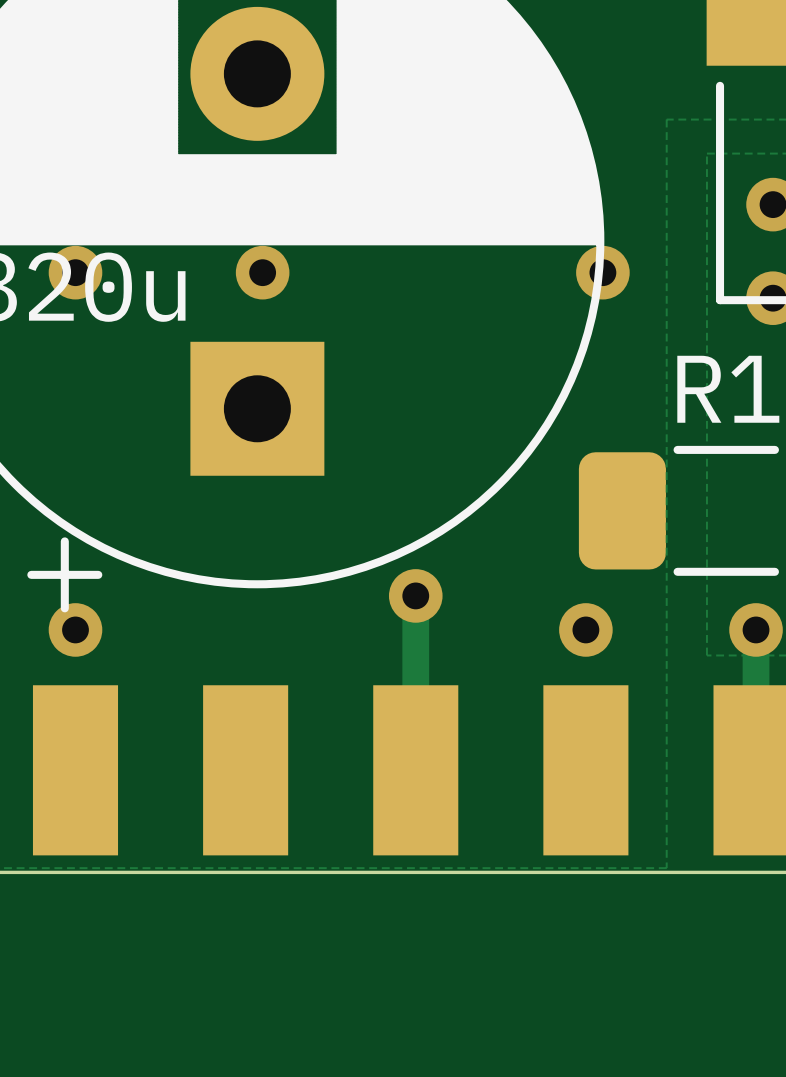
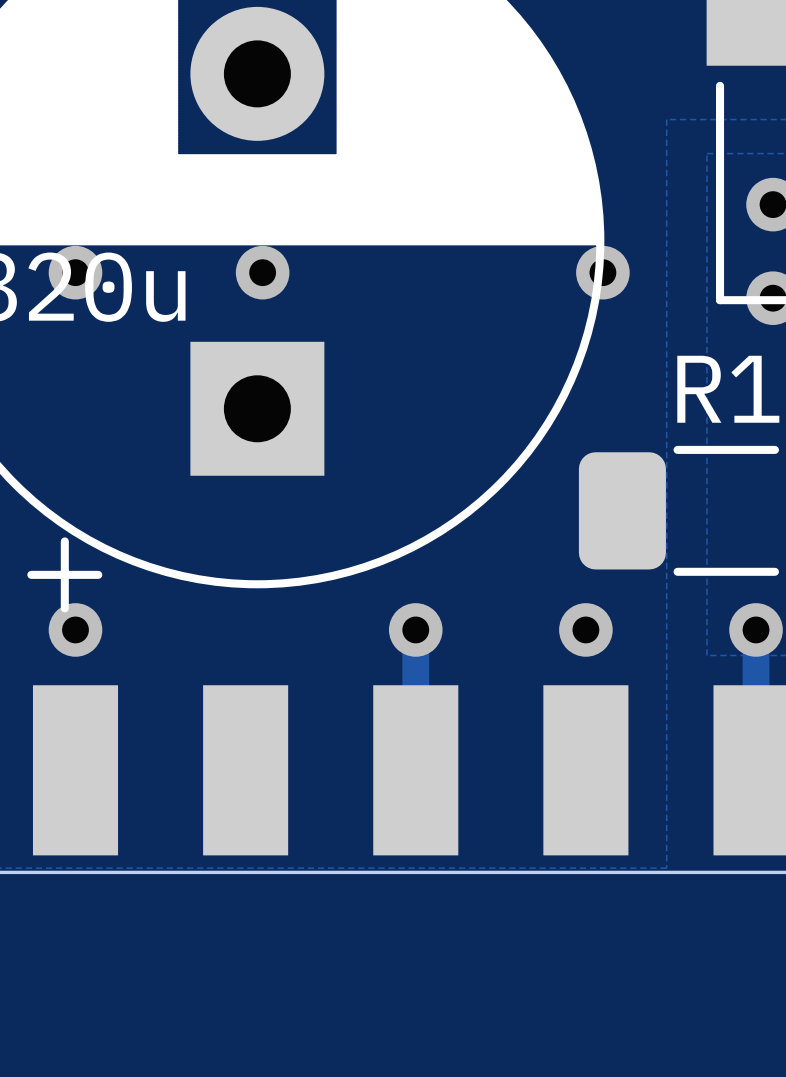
via position: (415, 595) -> (415, 629)

